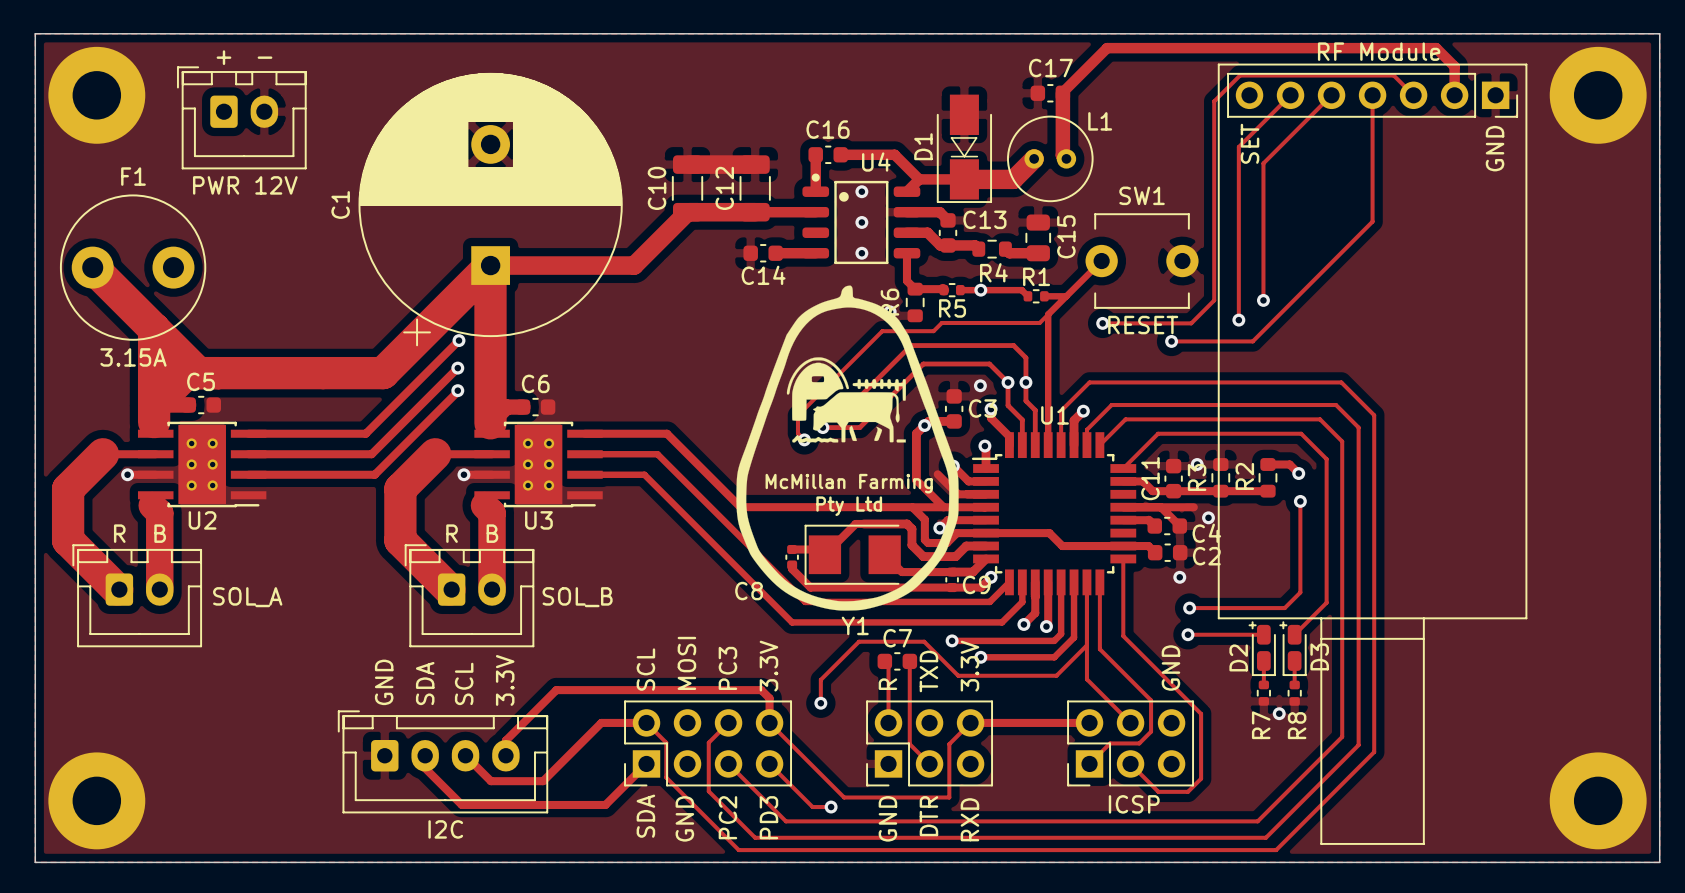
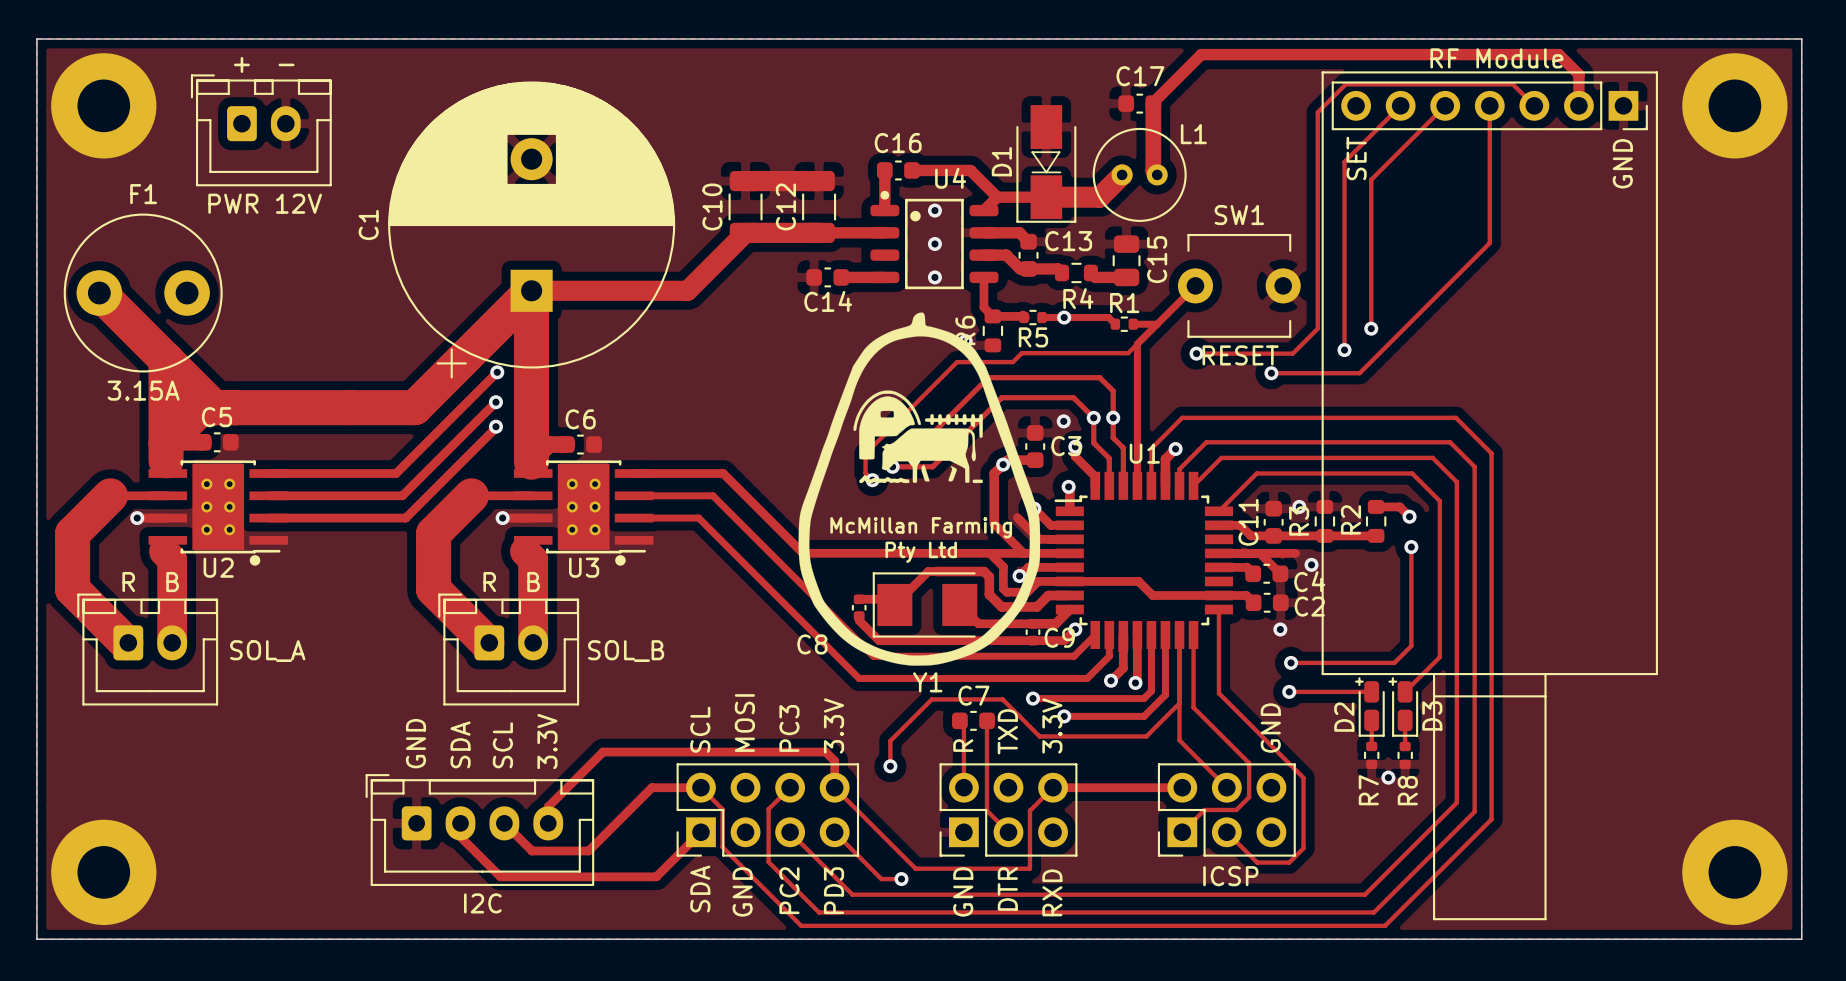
U2 footprint: [137, 421, 267, 508] -> [148, 460, 288, 566]
U3 footprint: [474, 421, 603, 508] -> [513, 460, 654, 566]

